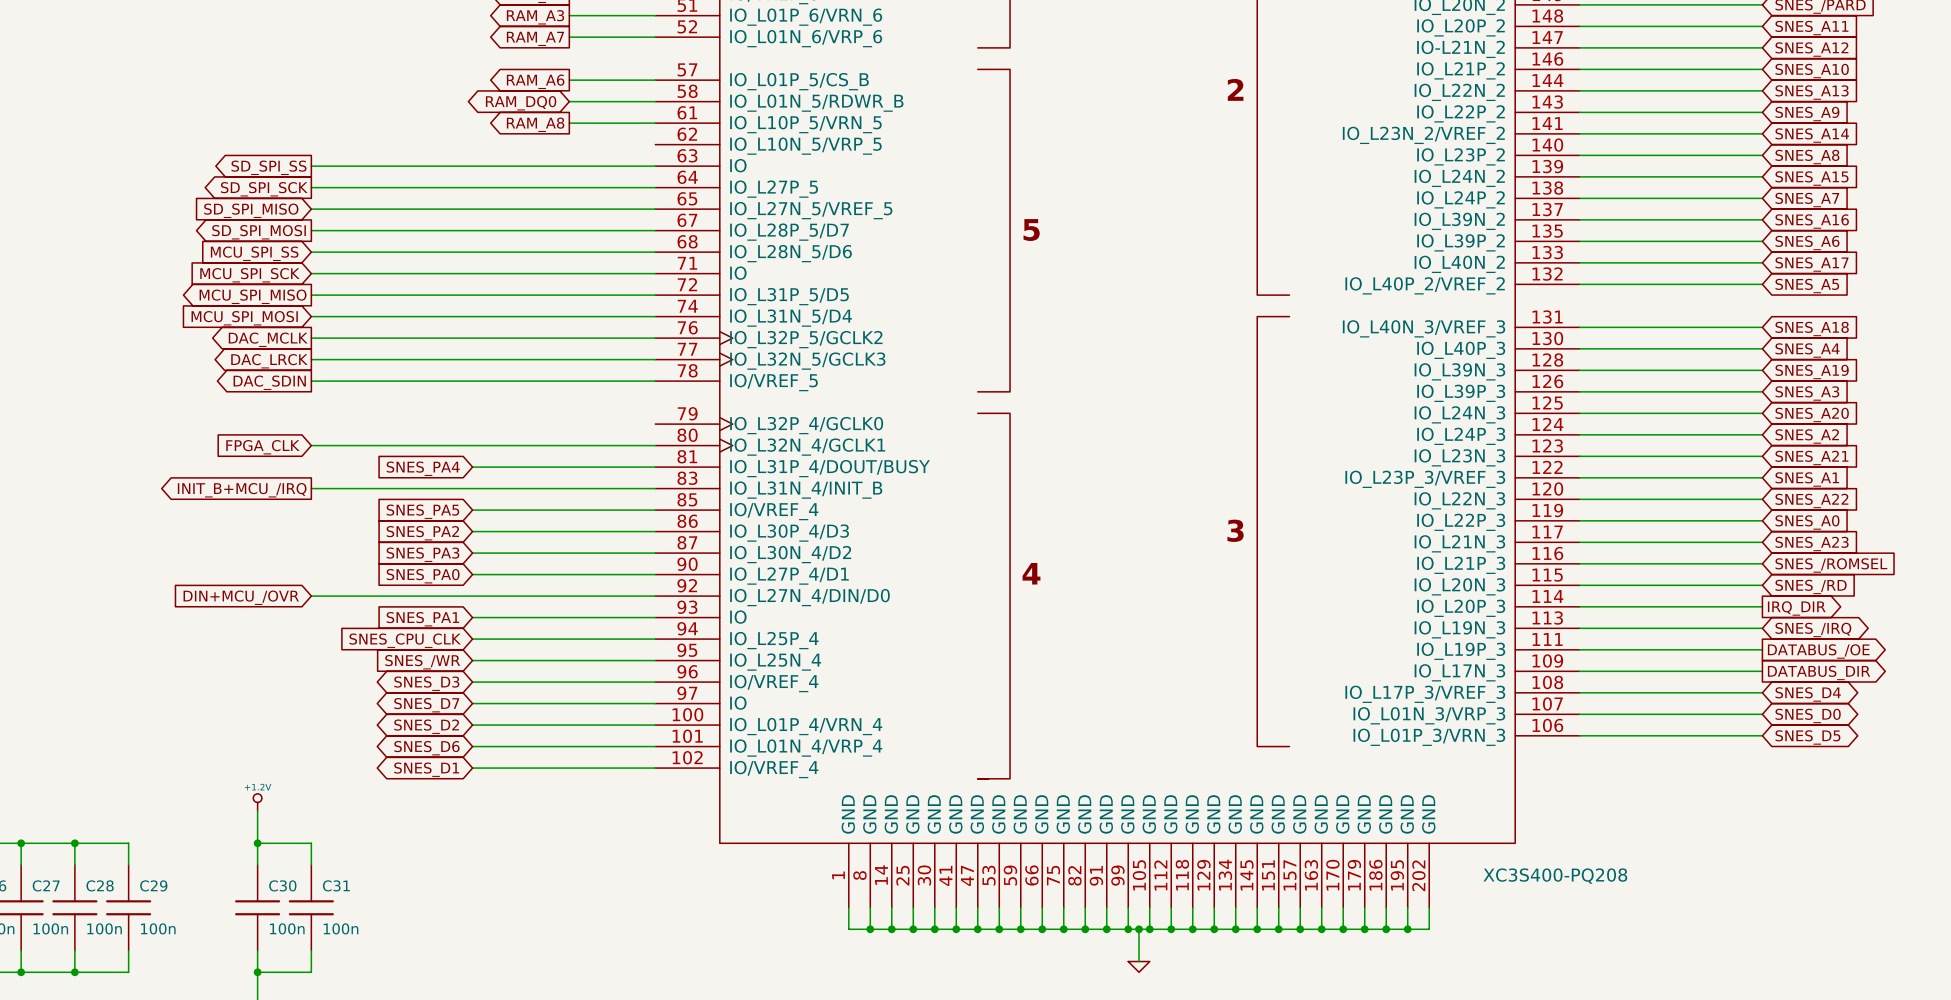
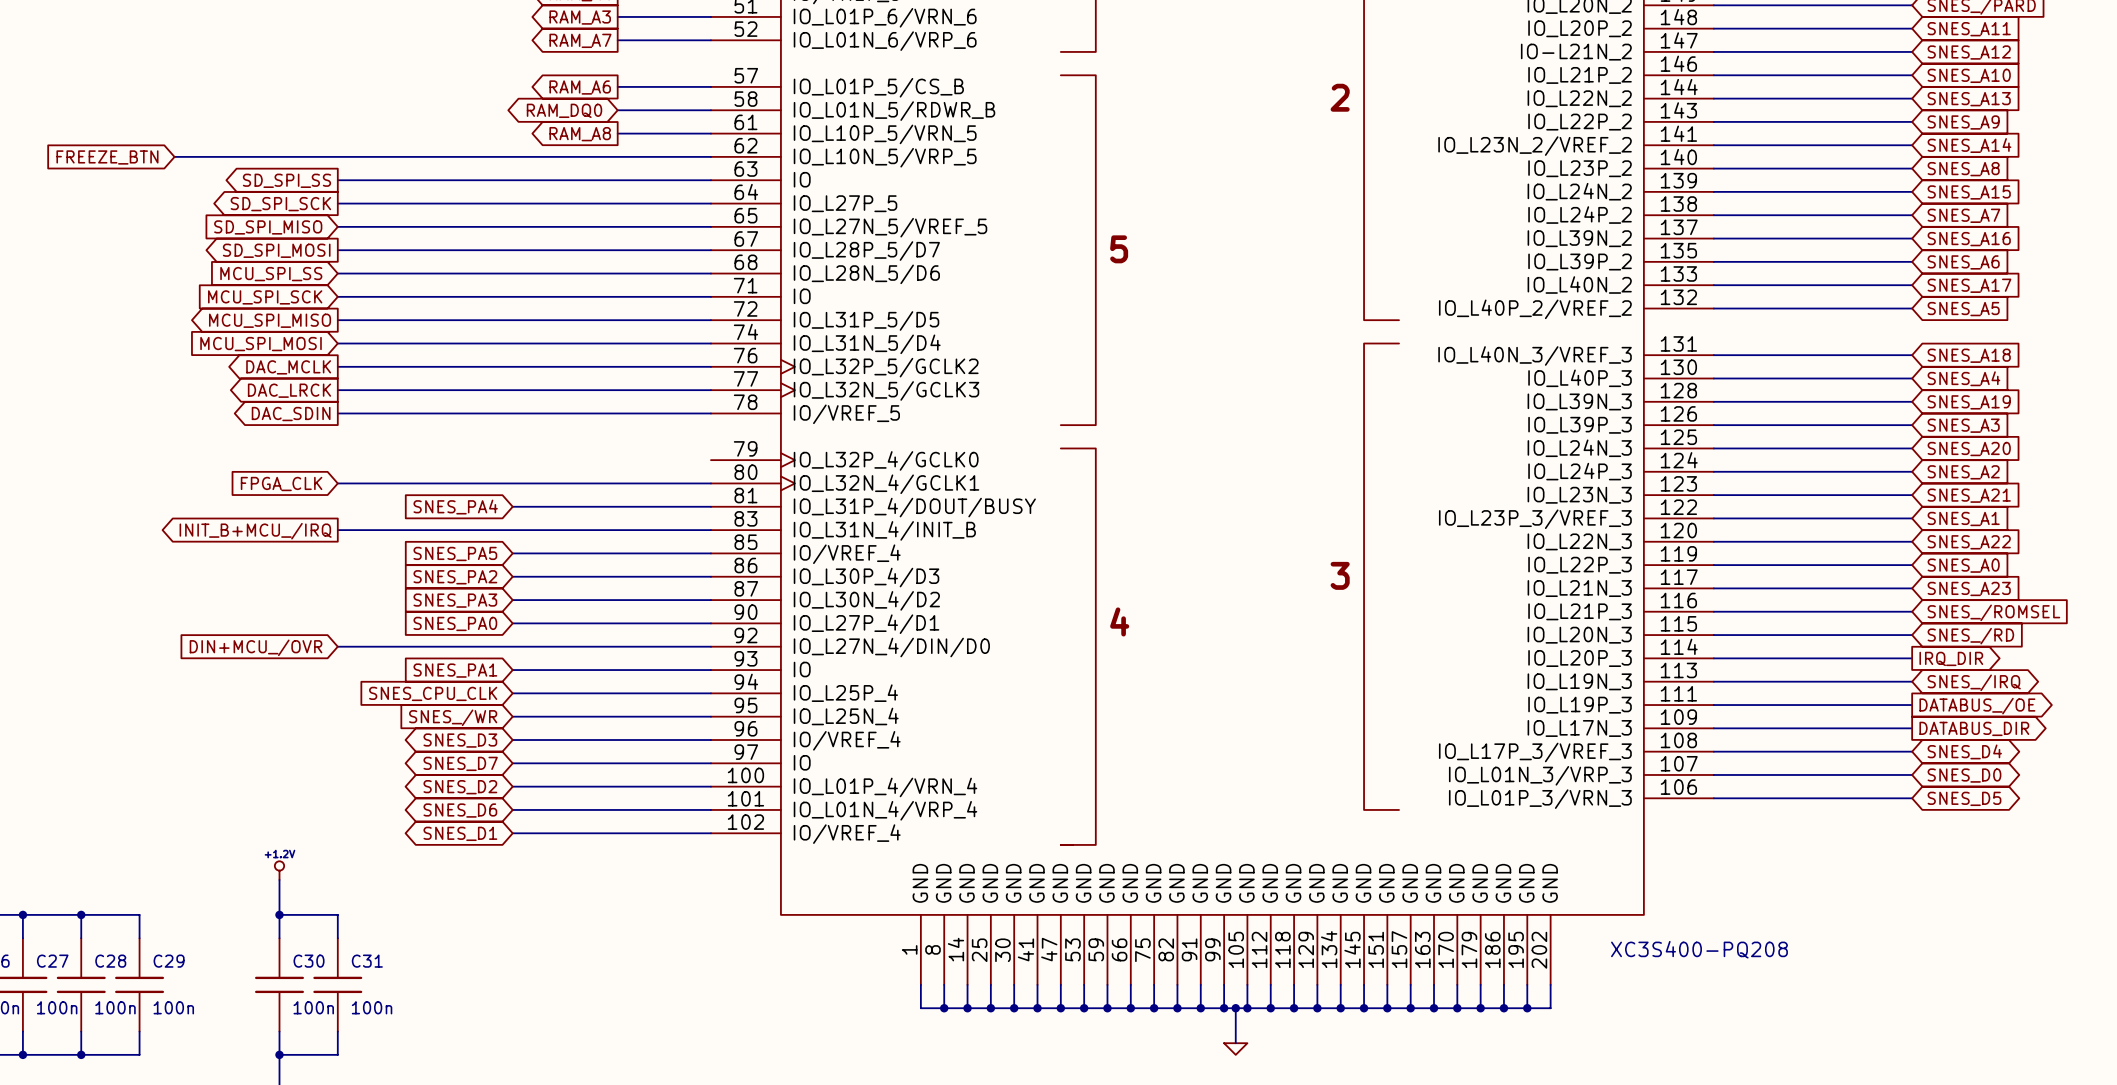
wire: none -> (174, 156) (710, 156)
global label: none -> FREEZE_BTN (107, 157)

